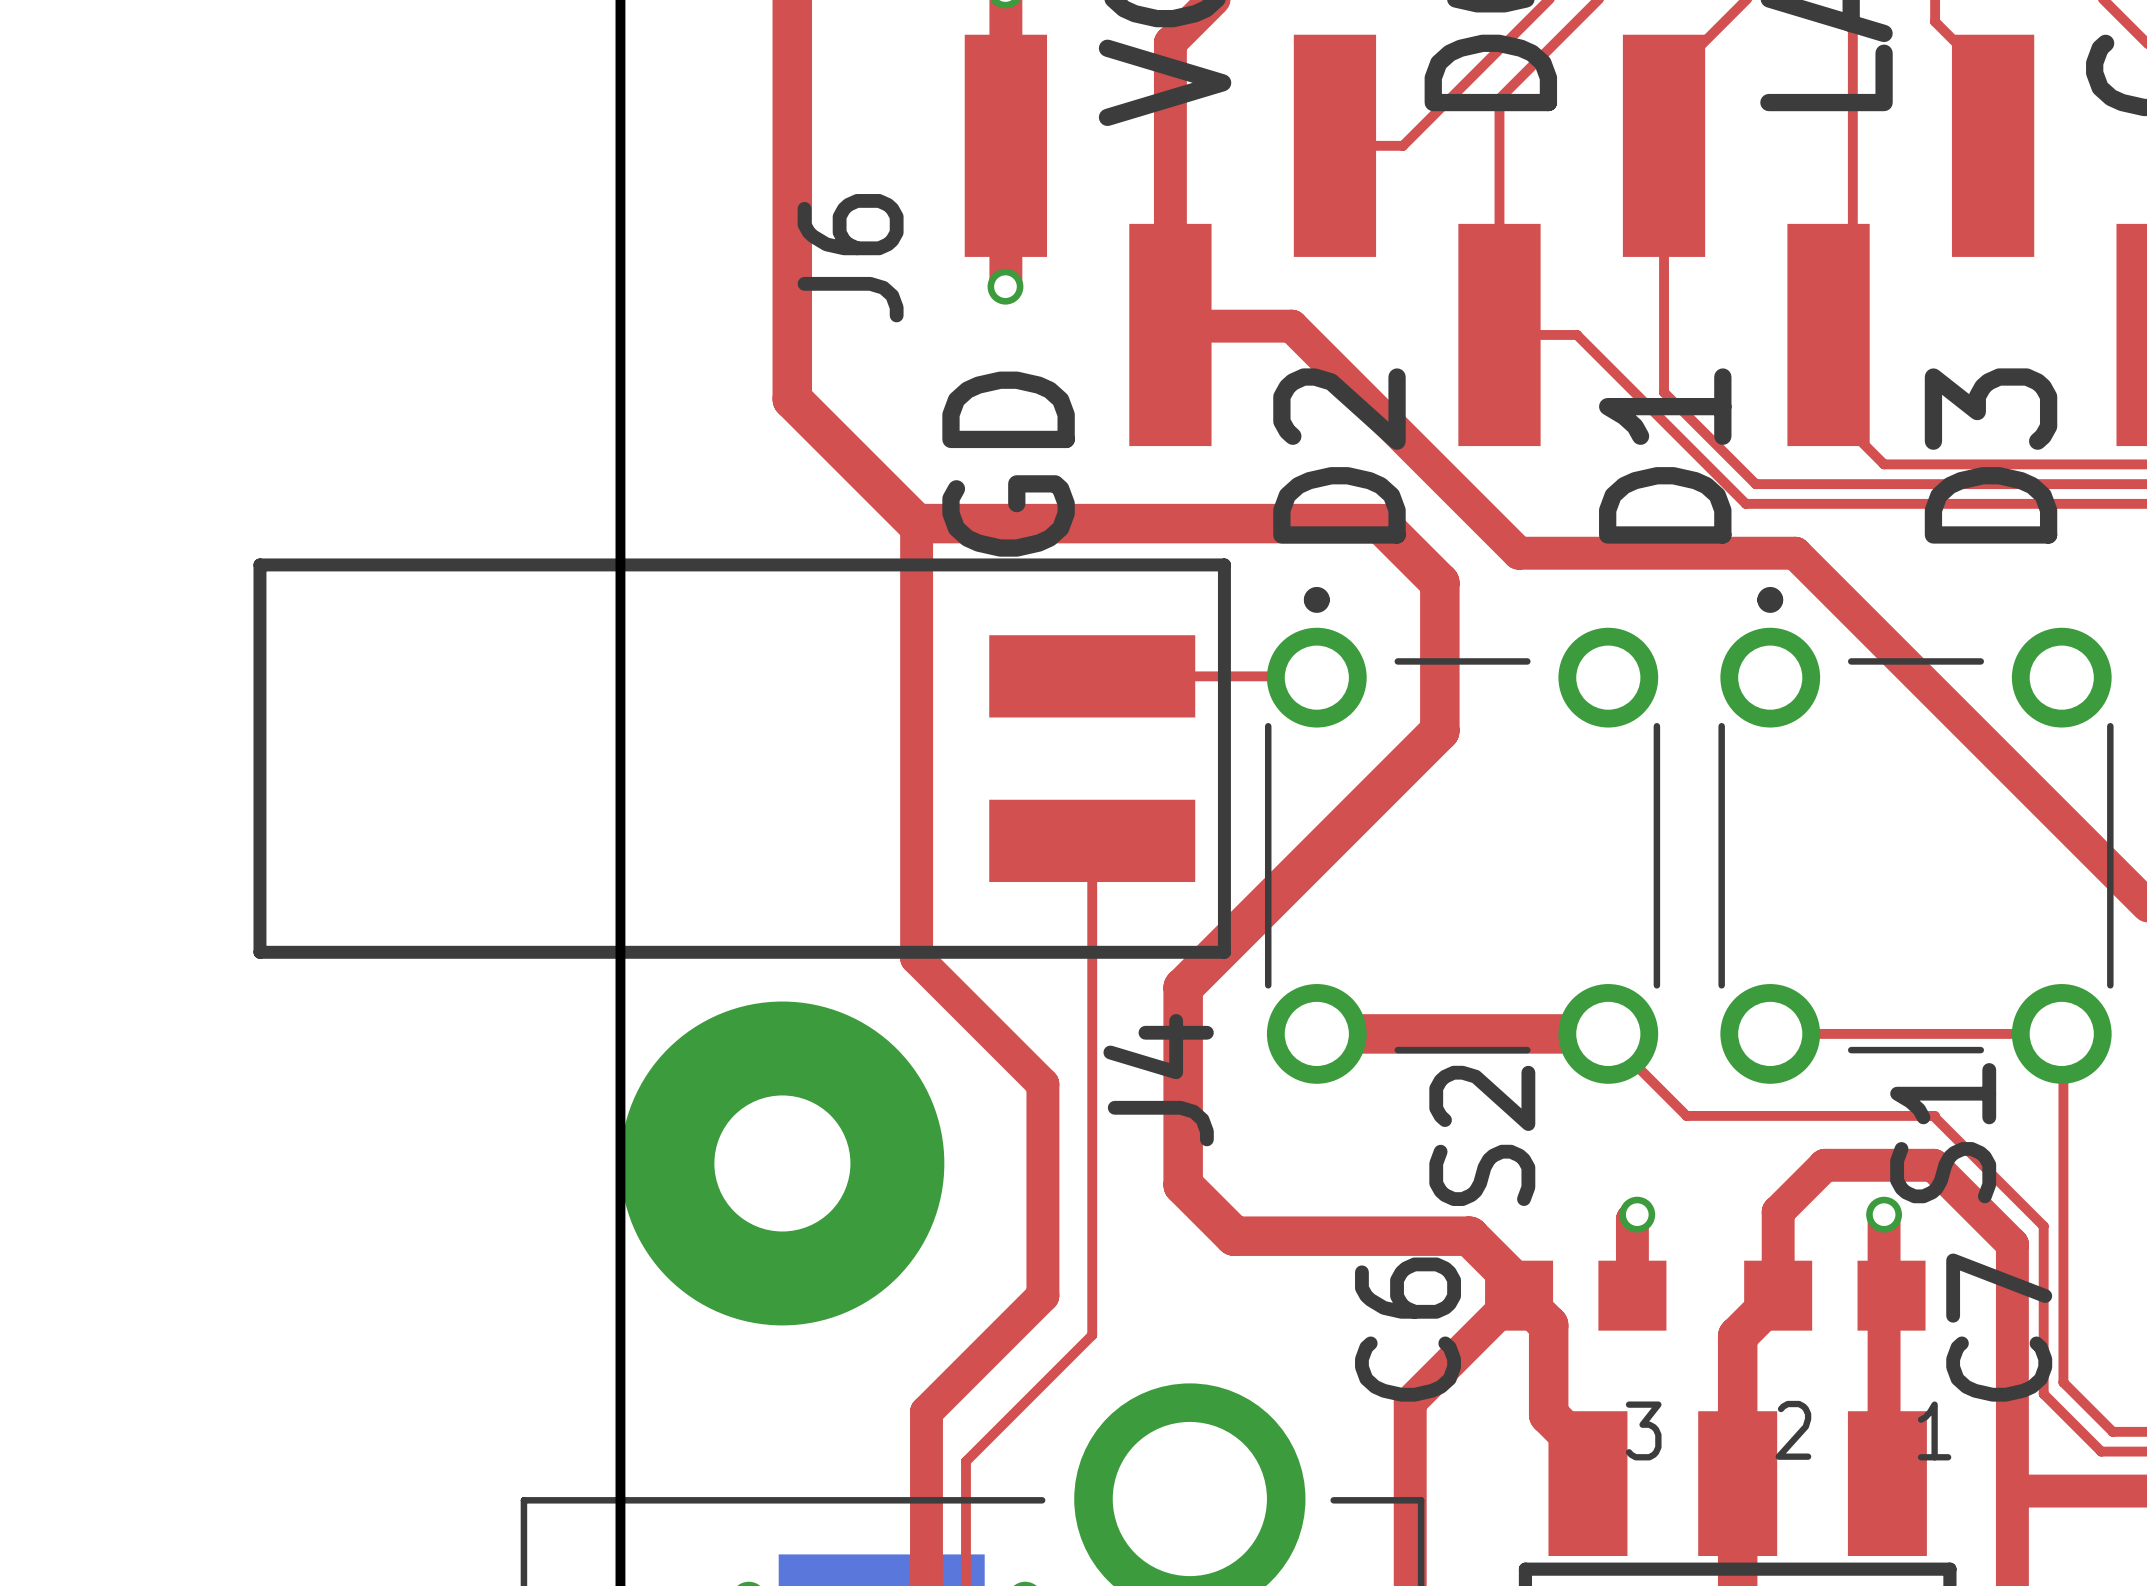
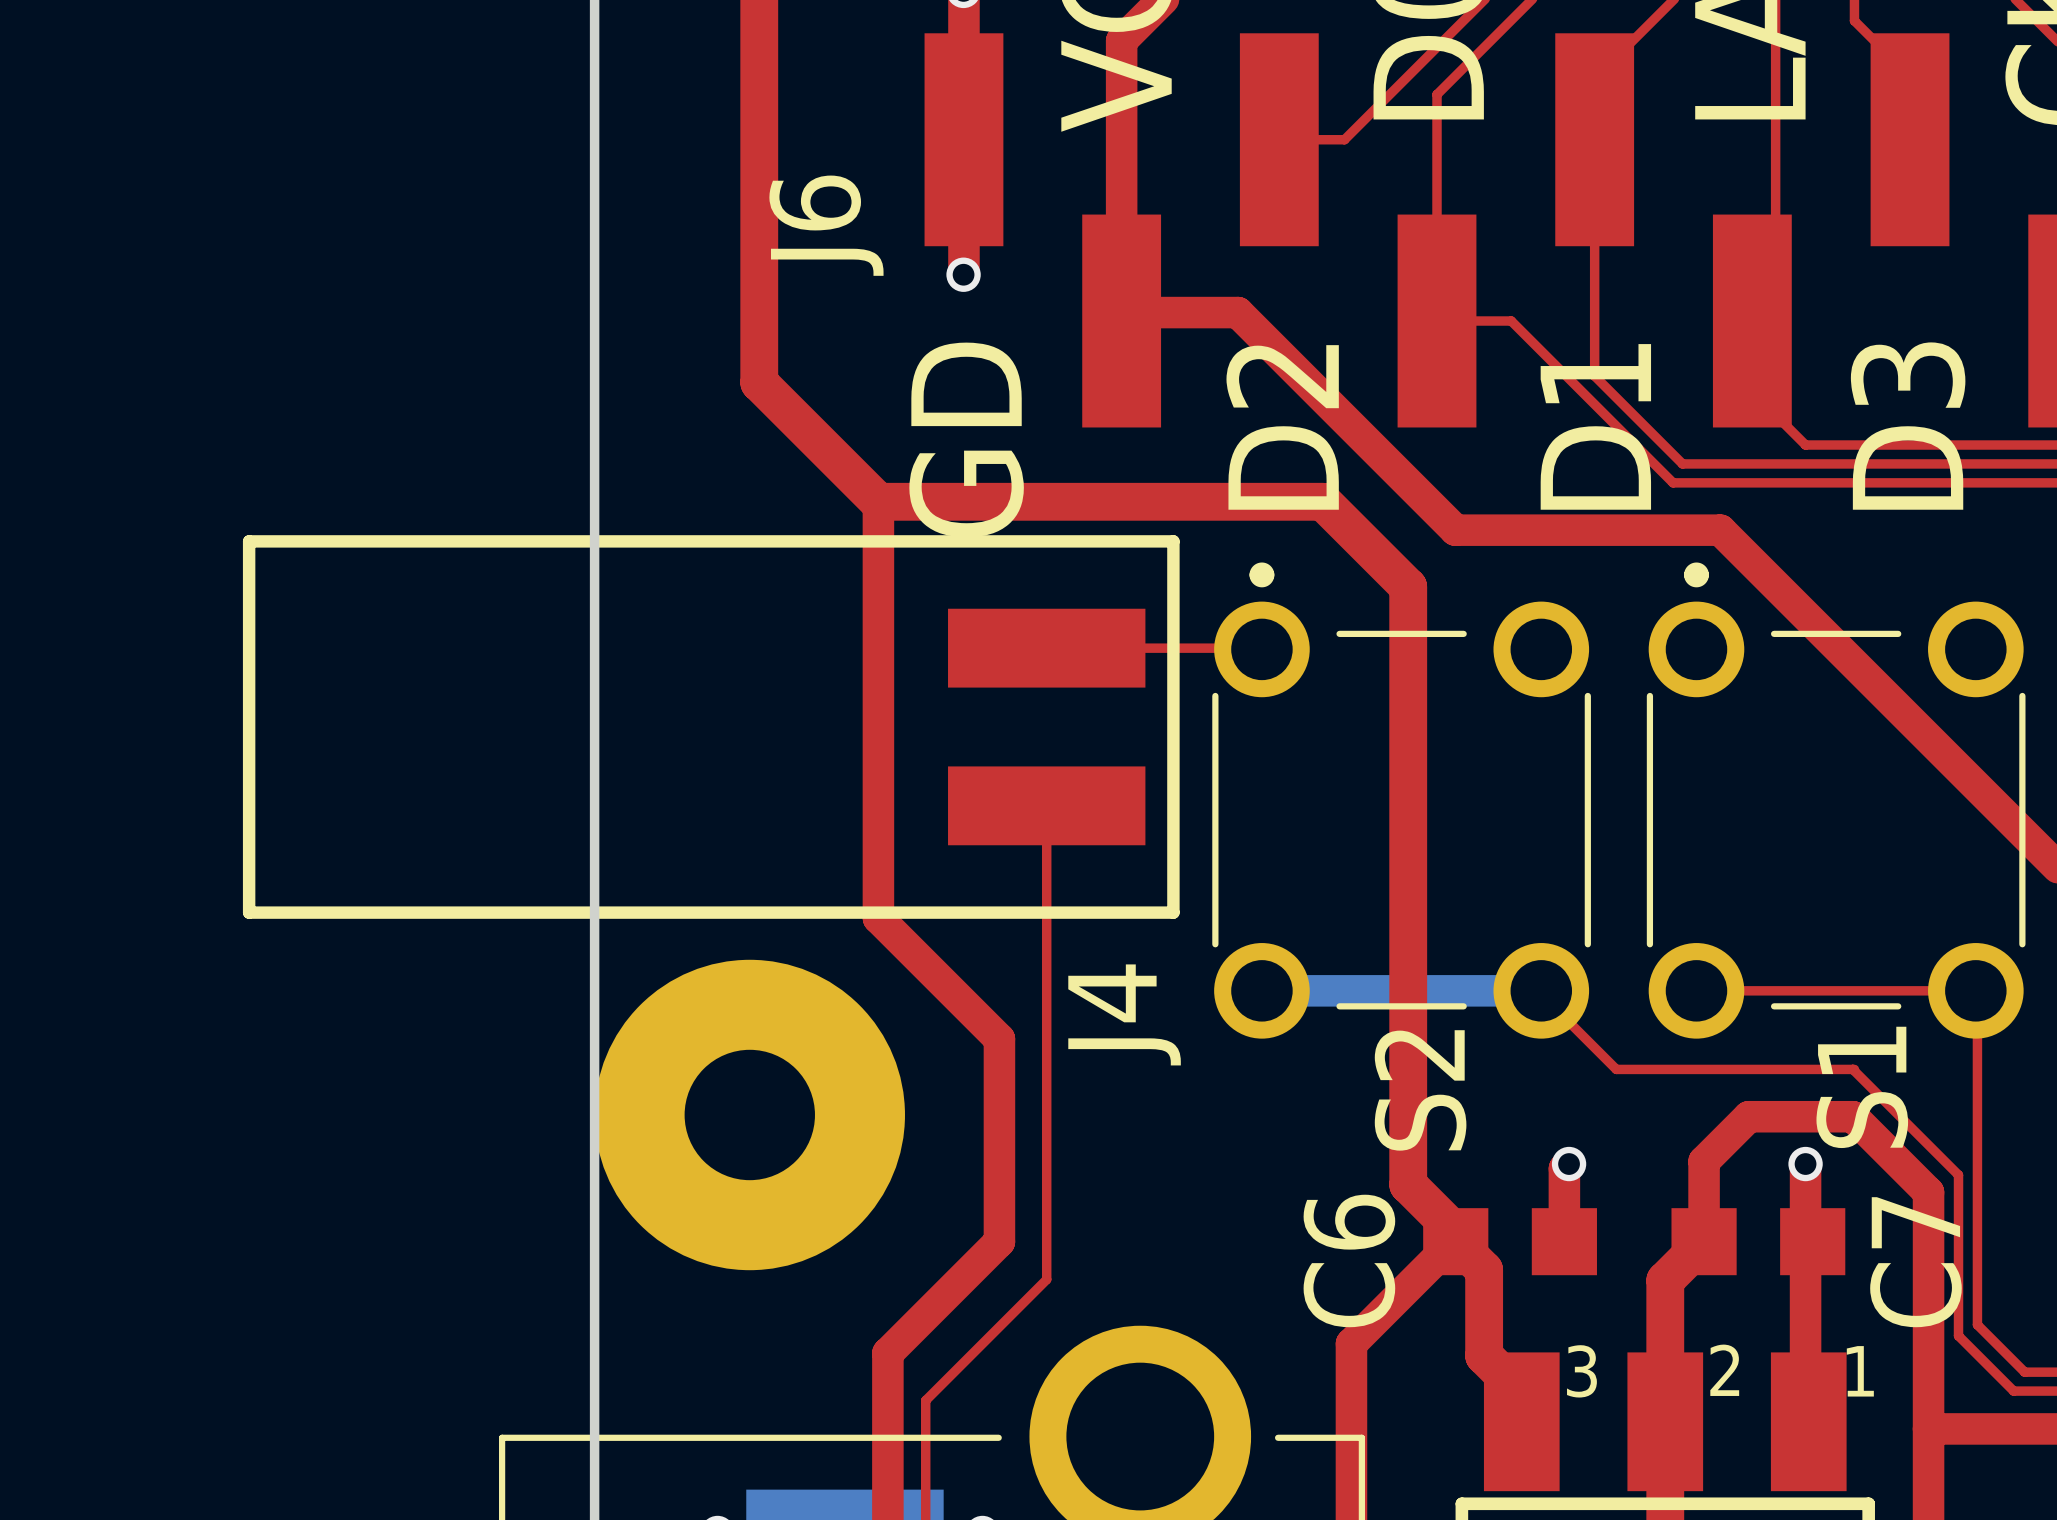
top track: (1439, 582) (1439, 730) (1183, 987) (1183, 1185) (1234, 1236) (1469, 1236) -> (1379, 558) (1408, 586) (1408, 1184)
top track: (1316, 1033) (1604, 1033) (1612, 1041) -> none
bottom track: none -> (1261, 990) (1541, 990)

